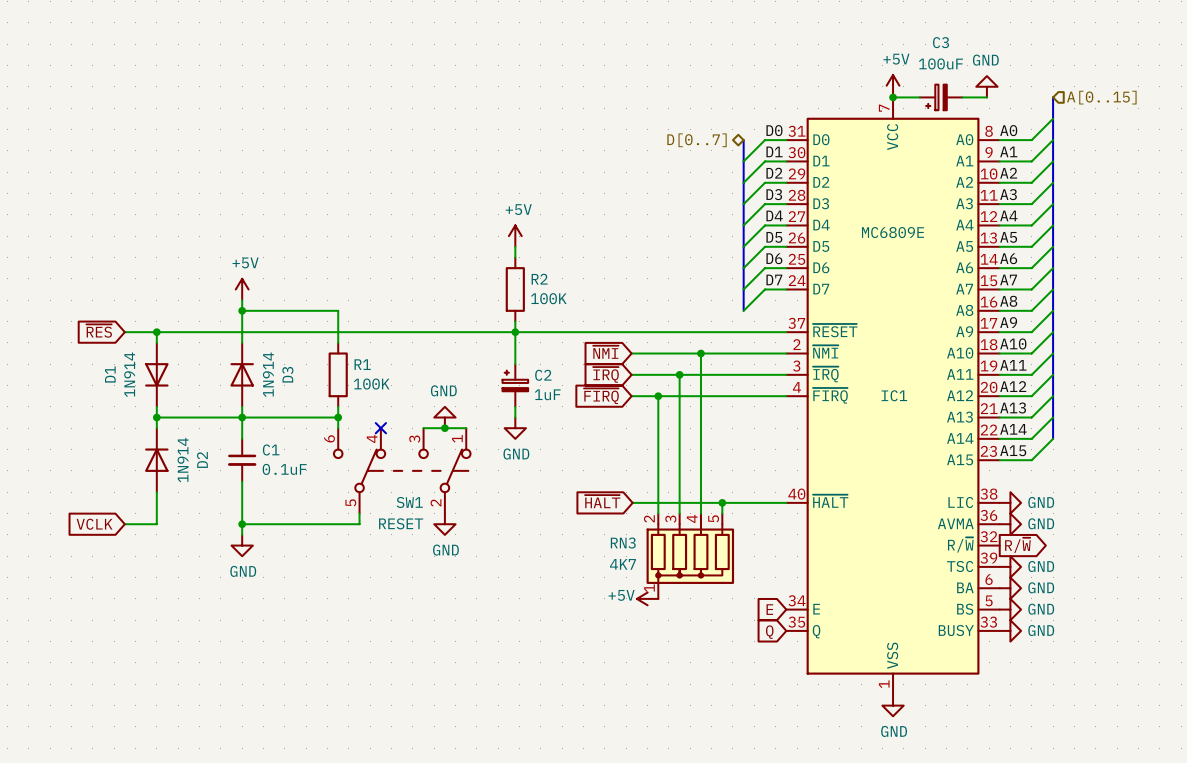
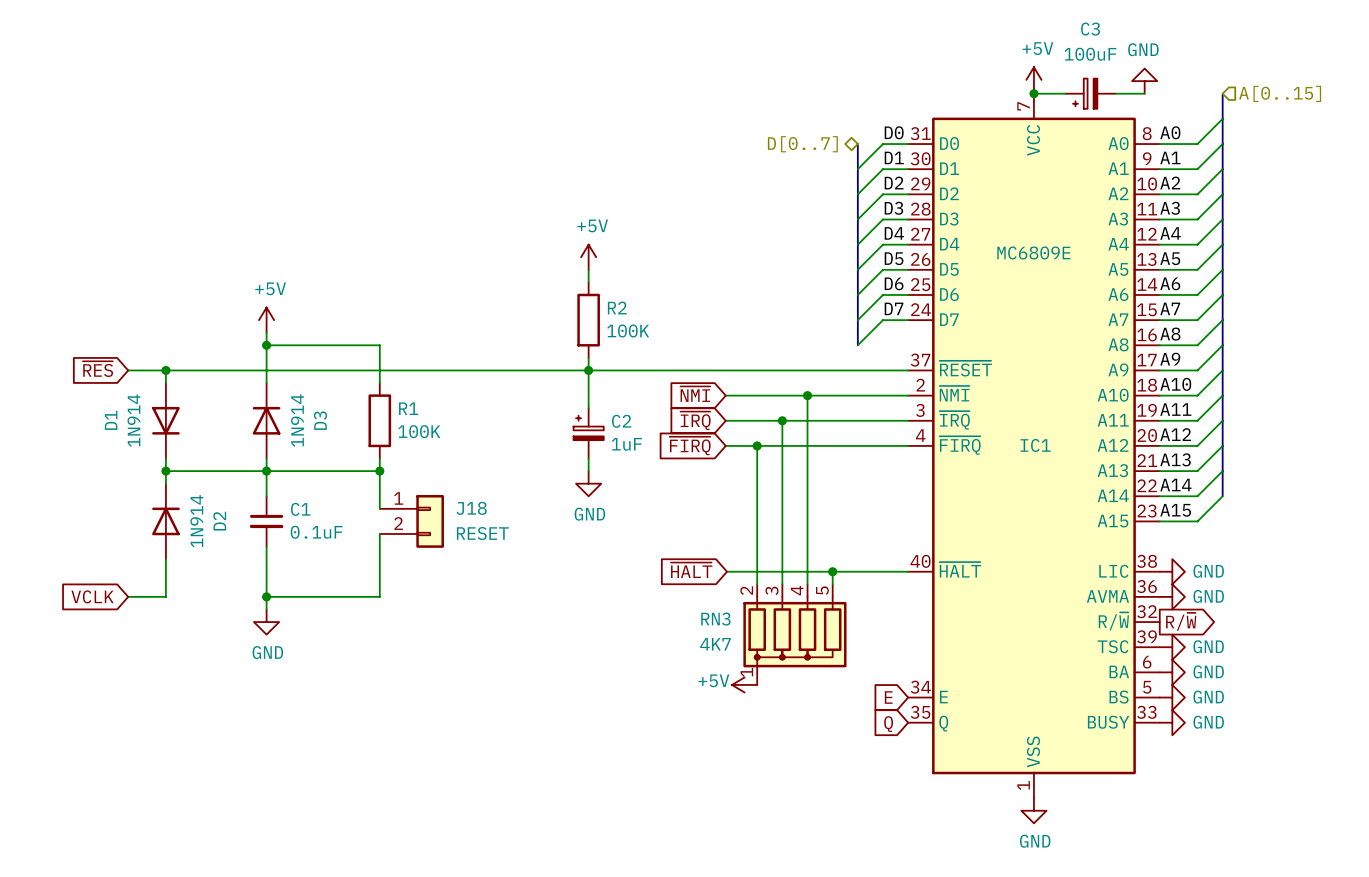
power symbol: GND (444, 417) -> none
no-connect mark: (380, 428) -> none
wire: (423, 428) (466, 428) -> none
junction: (444, 428) -> none
J18: none -> RESET (411, 521)
SW1: RESET (402, 470) -> none
wire: (359, 513) (359, 524) (338, 524) -> (379, 534) (379, 596)
power symbol: GND (444, 524) -> none

